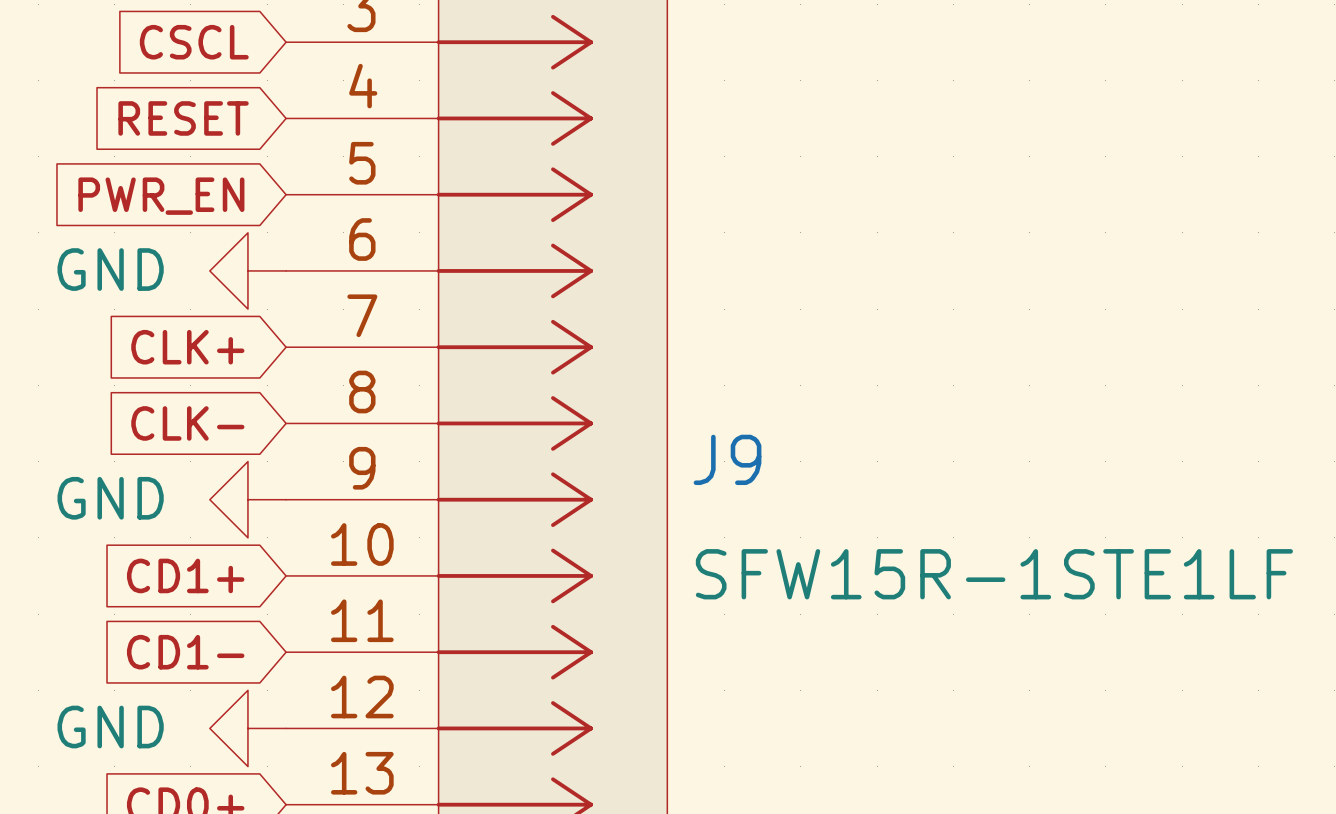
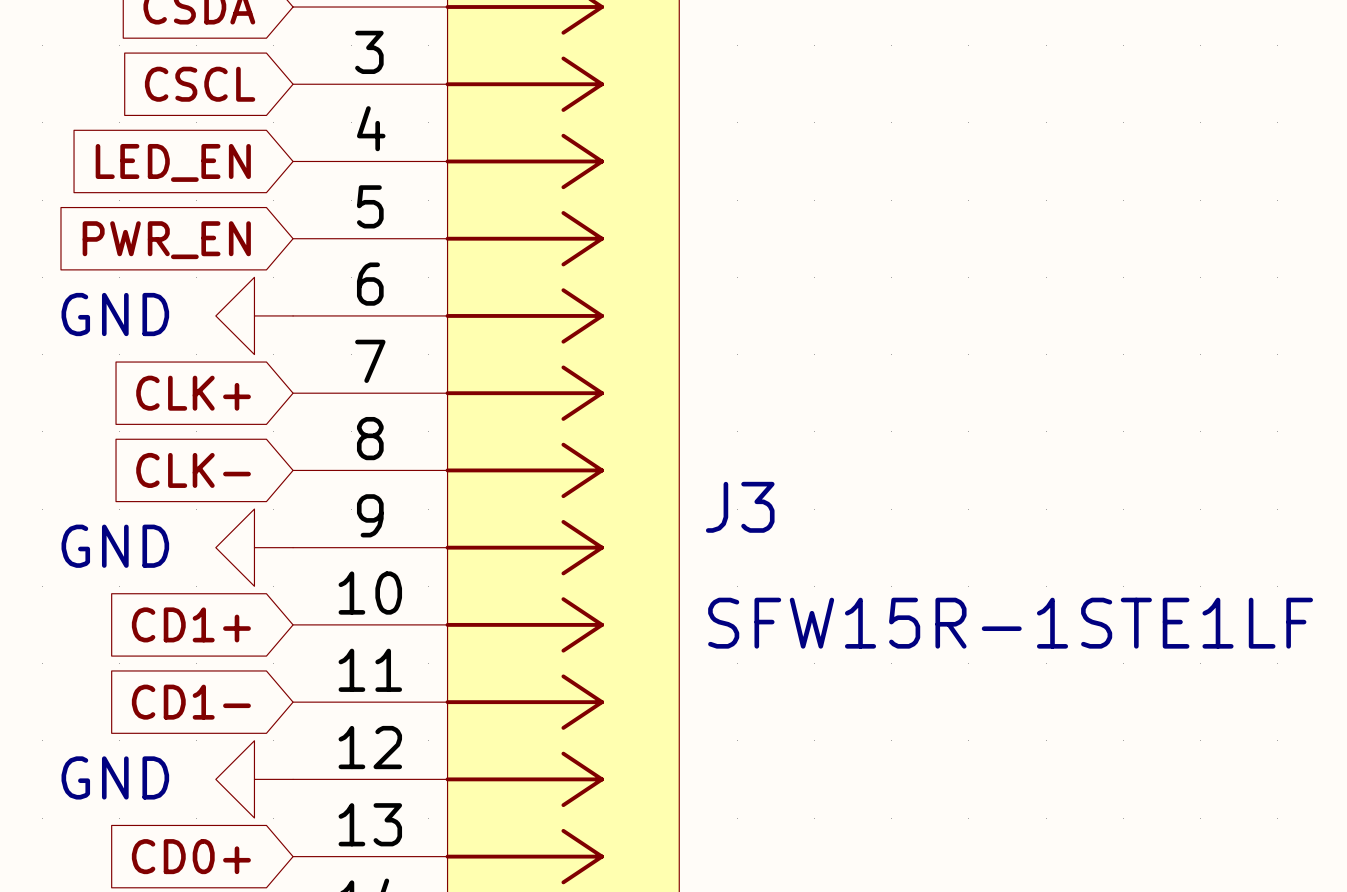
global label: RESET (183, 118) -> LED_EN (173, 162)
J9 name: J9 (727, 459) -> J3 (740, 507)

